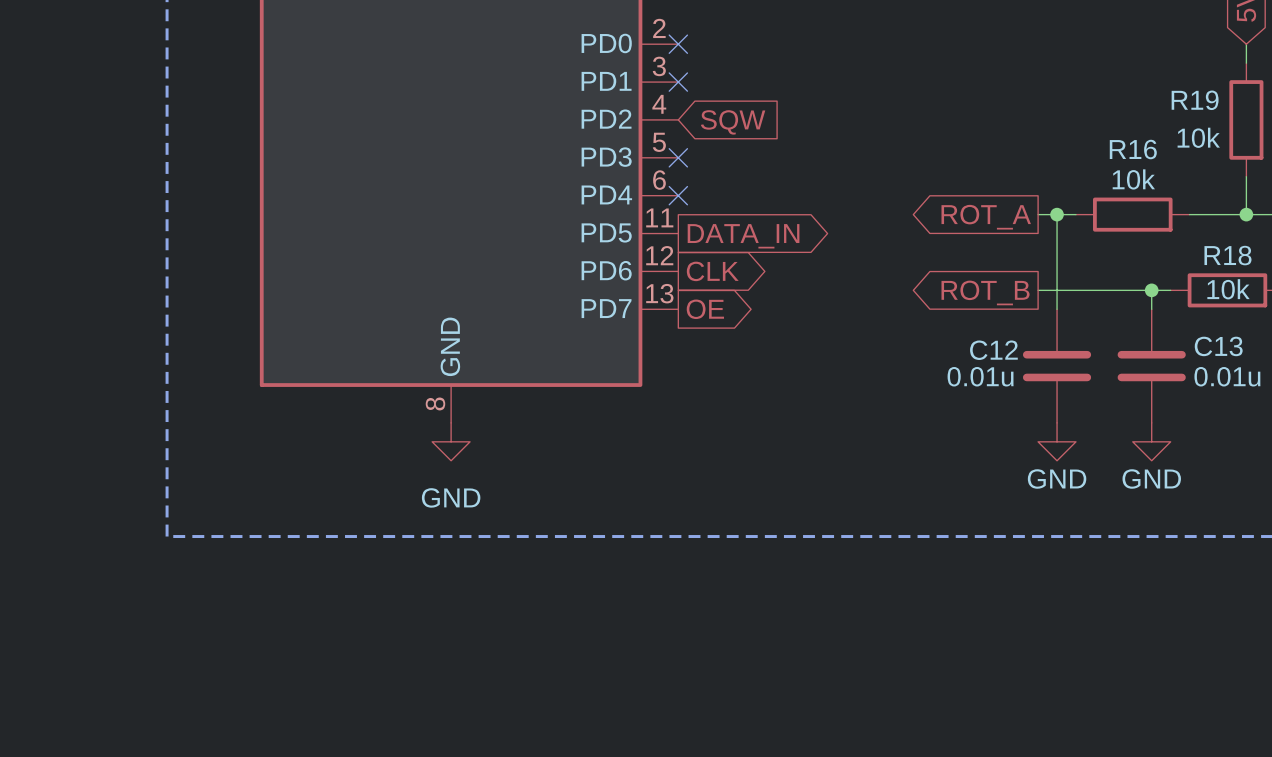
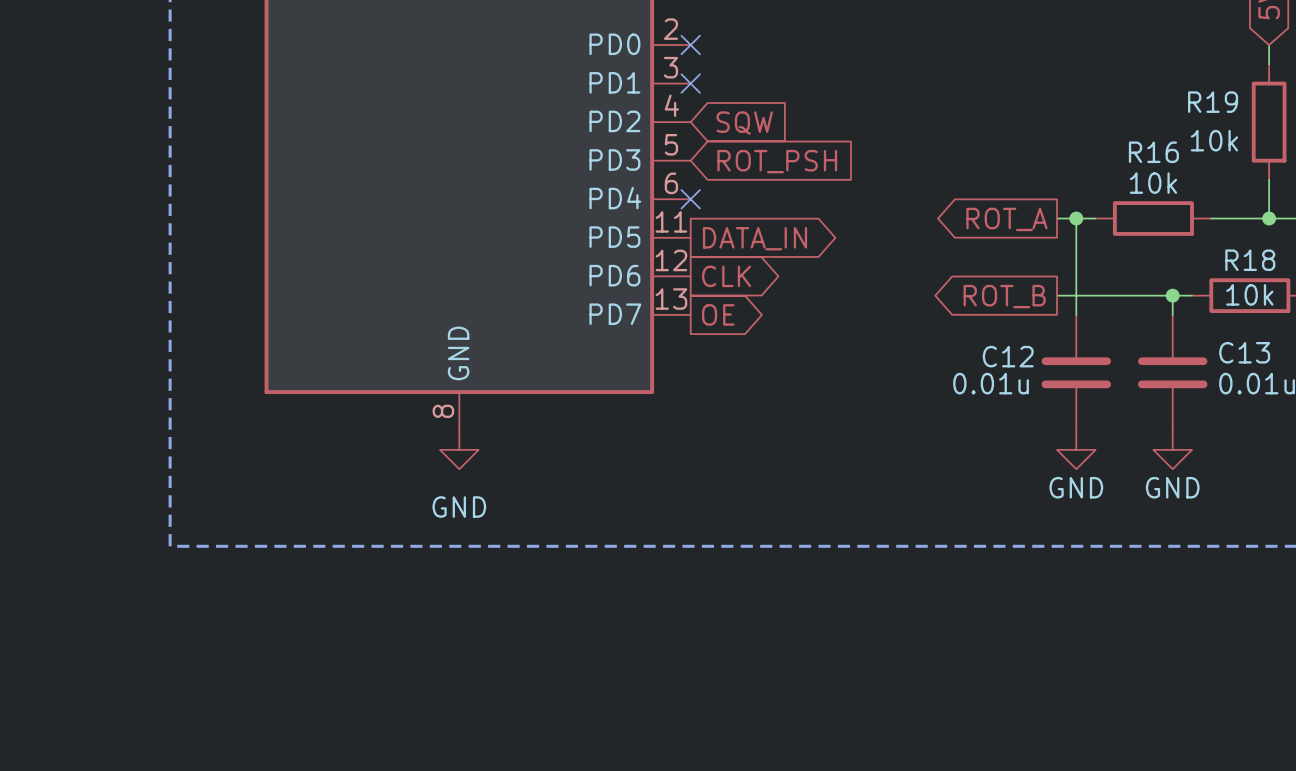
no-connect mark: (678, 157) -> none
global label: none -> ROT_PSH (777, 161)

